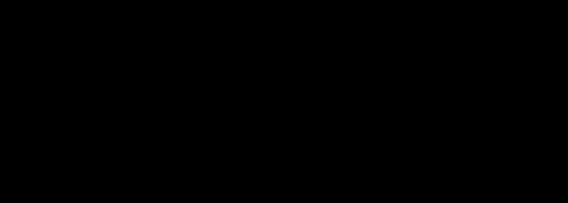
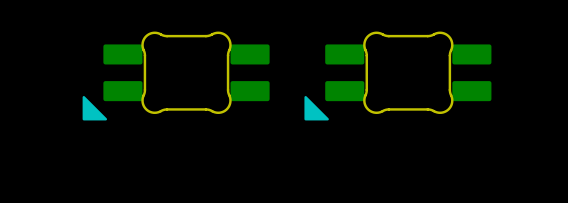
part: none -> (176, 76)
part: none -> (397, 76)

